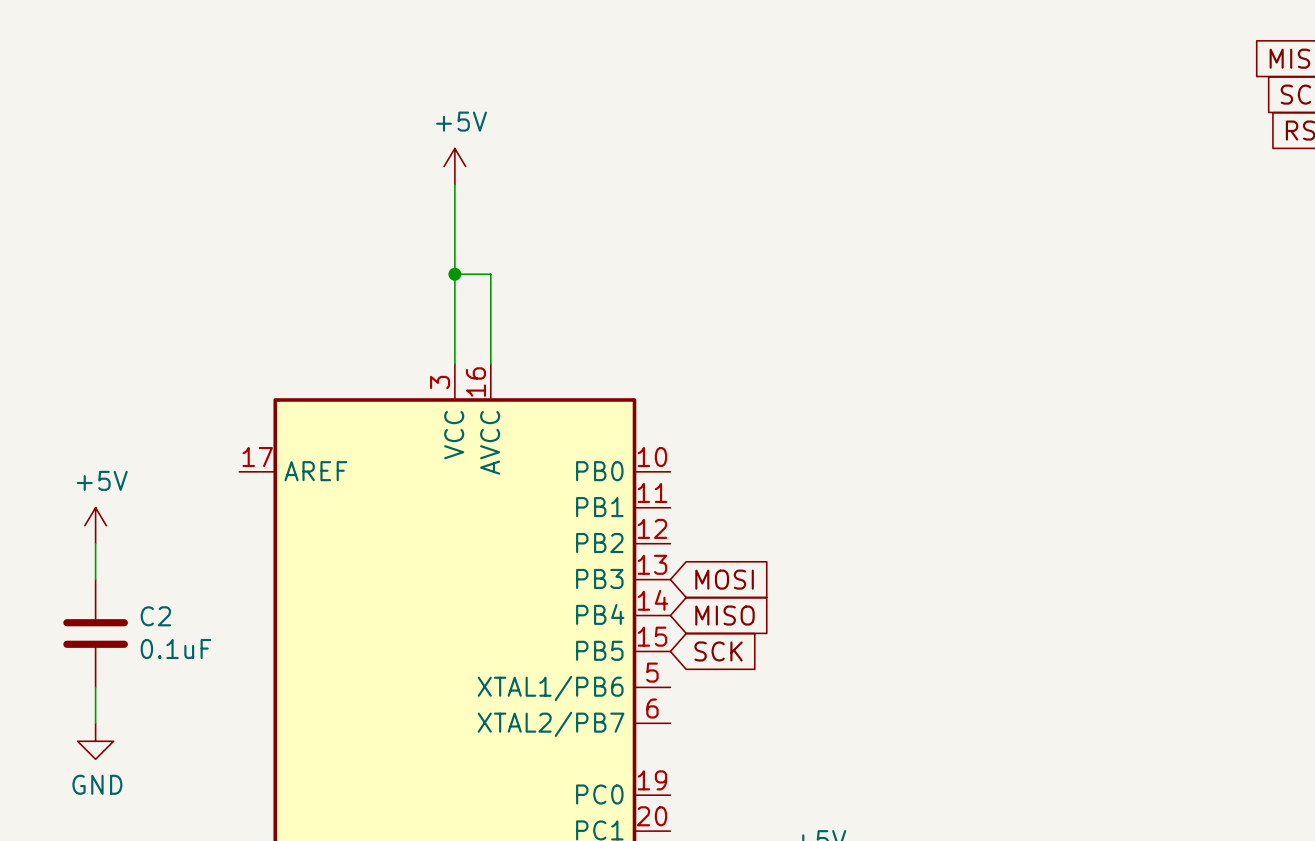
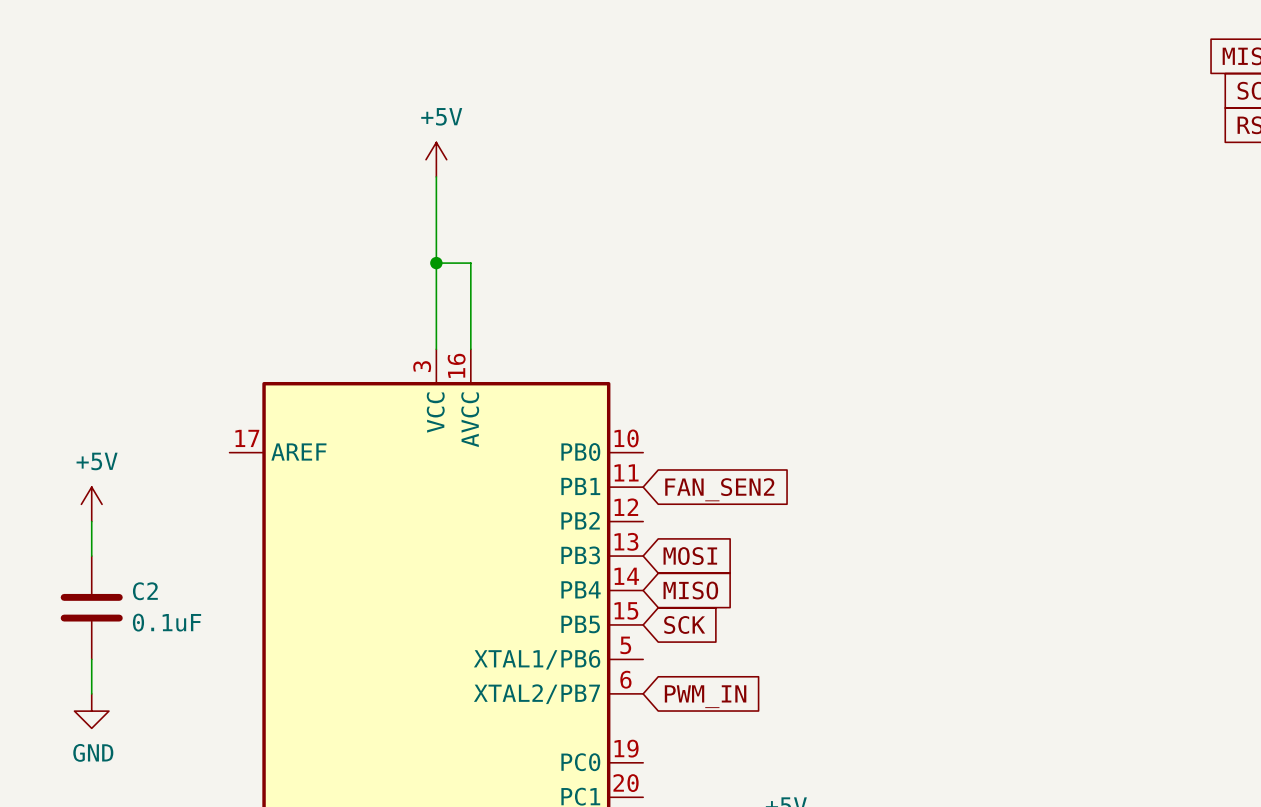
global label: none -> FAN_SEN2 (719, 489)
global label: none -> PWM_IN (705, 696)

